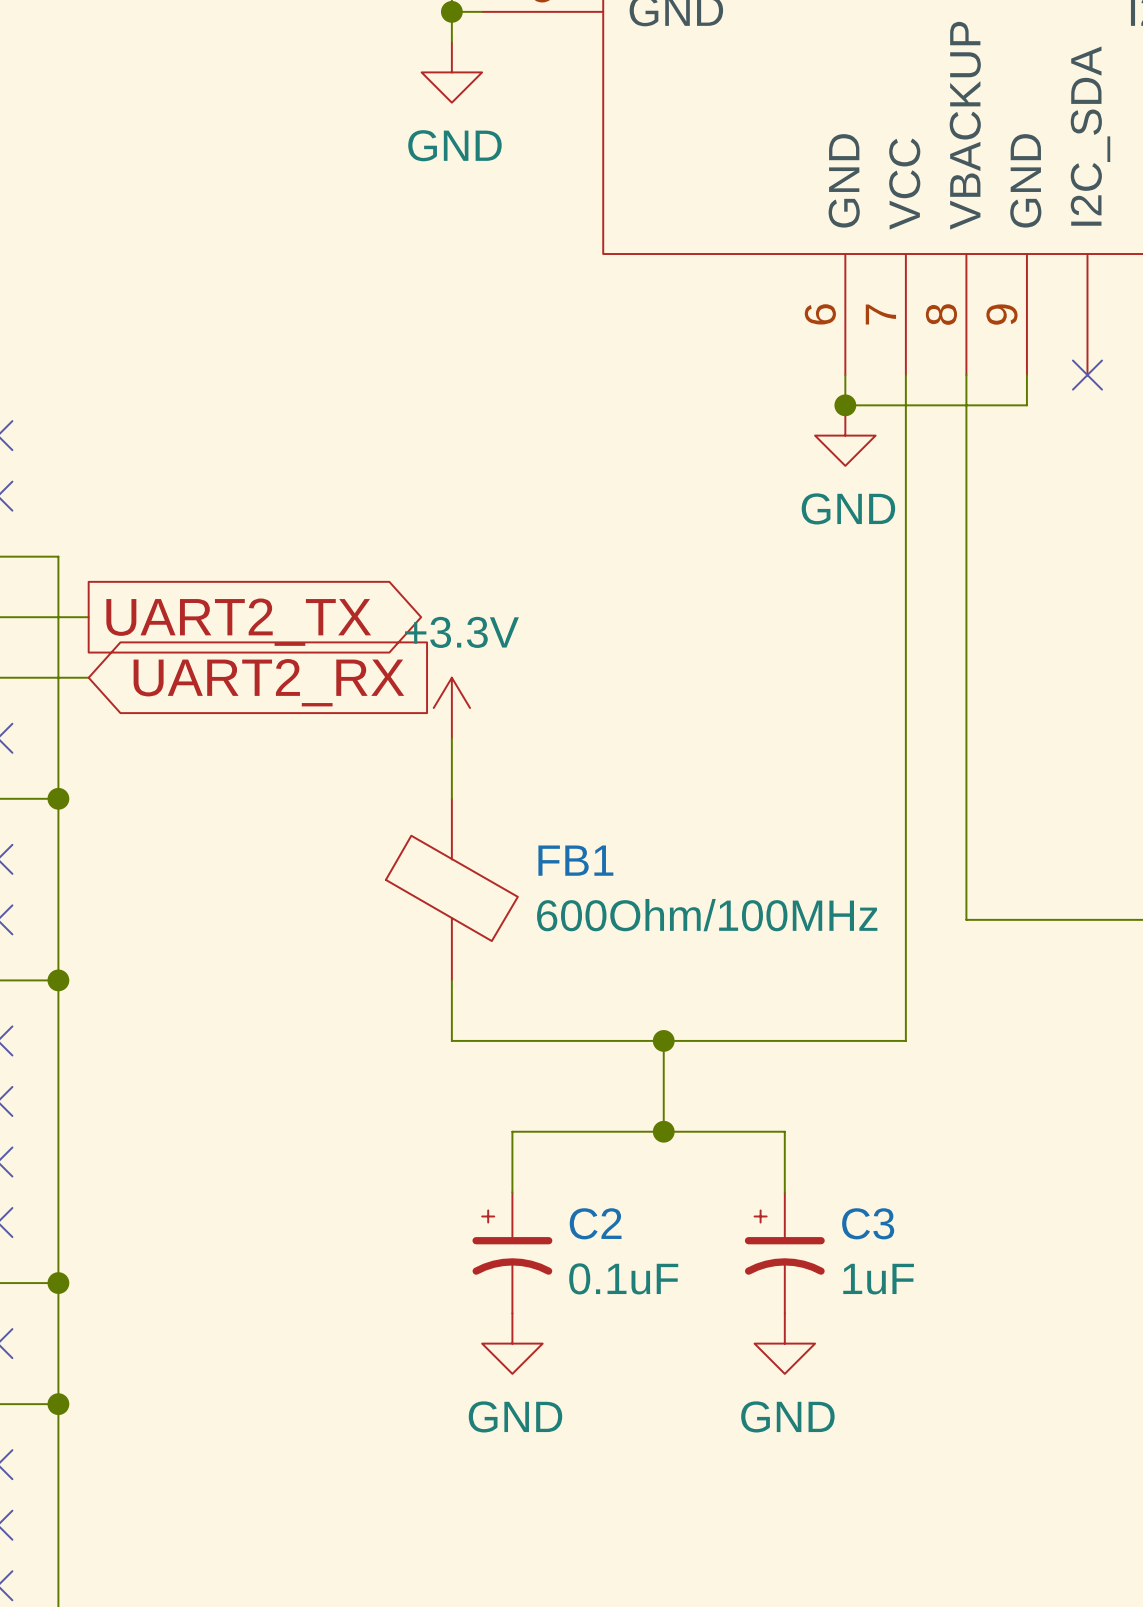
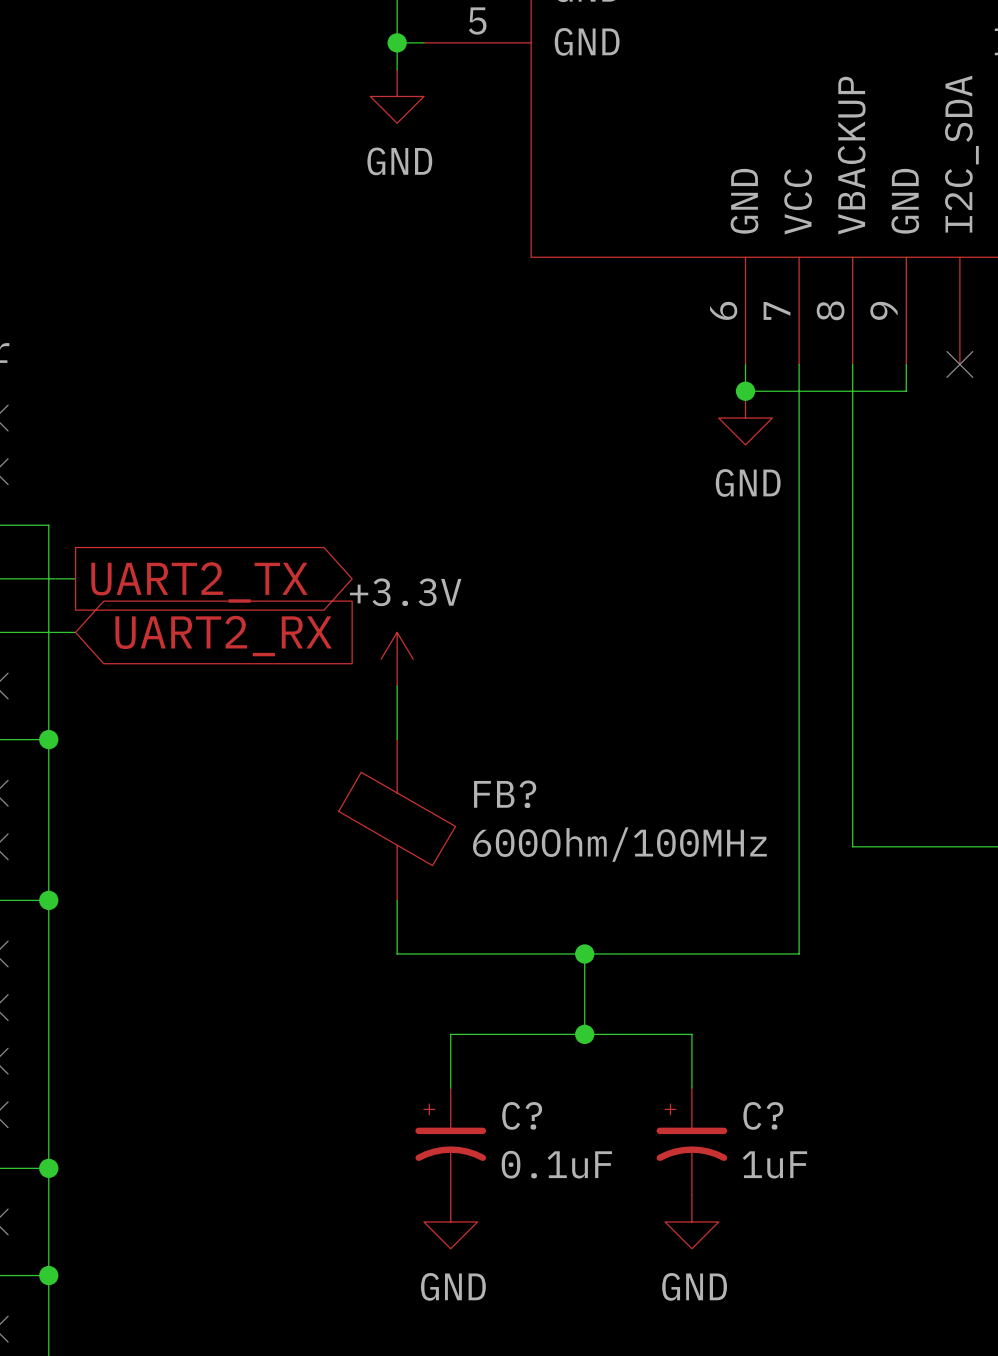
FB1 name: FB1 (575, 860) -> FB? (505, 794)
C2 name: C2 (595, 1223) -> C? (522, 1115)
C3 name: C3 (868, 1223) -> C? (763, 1115)

